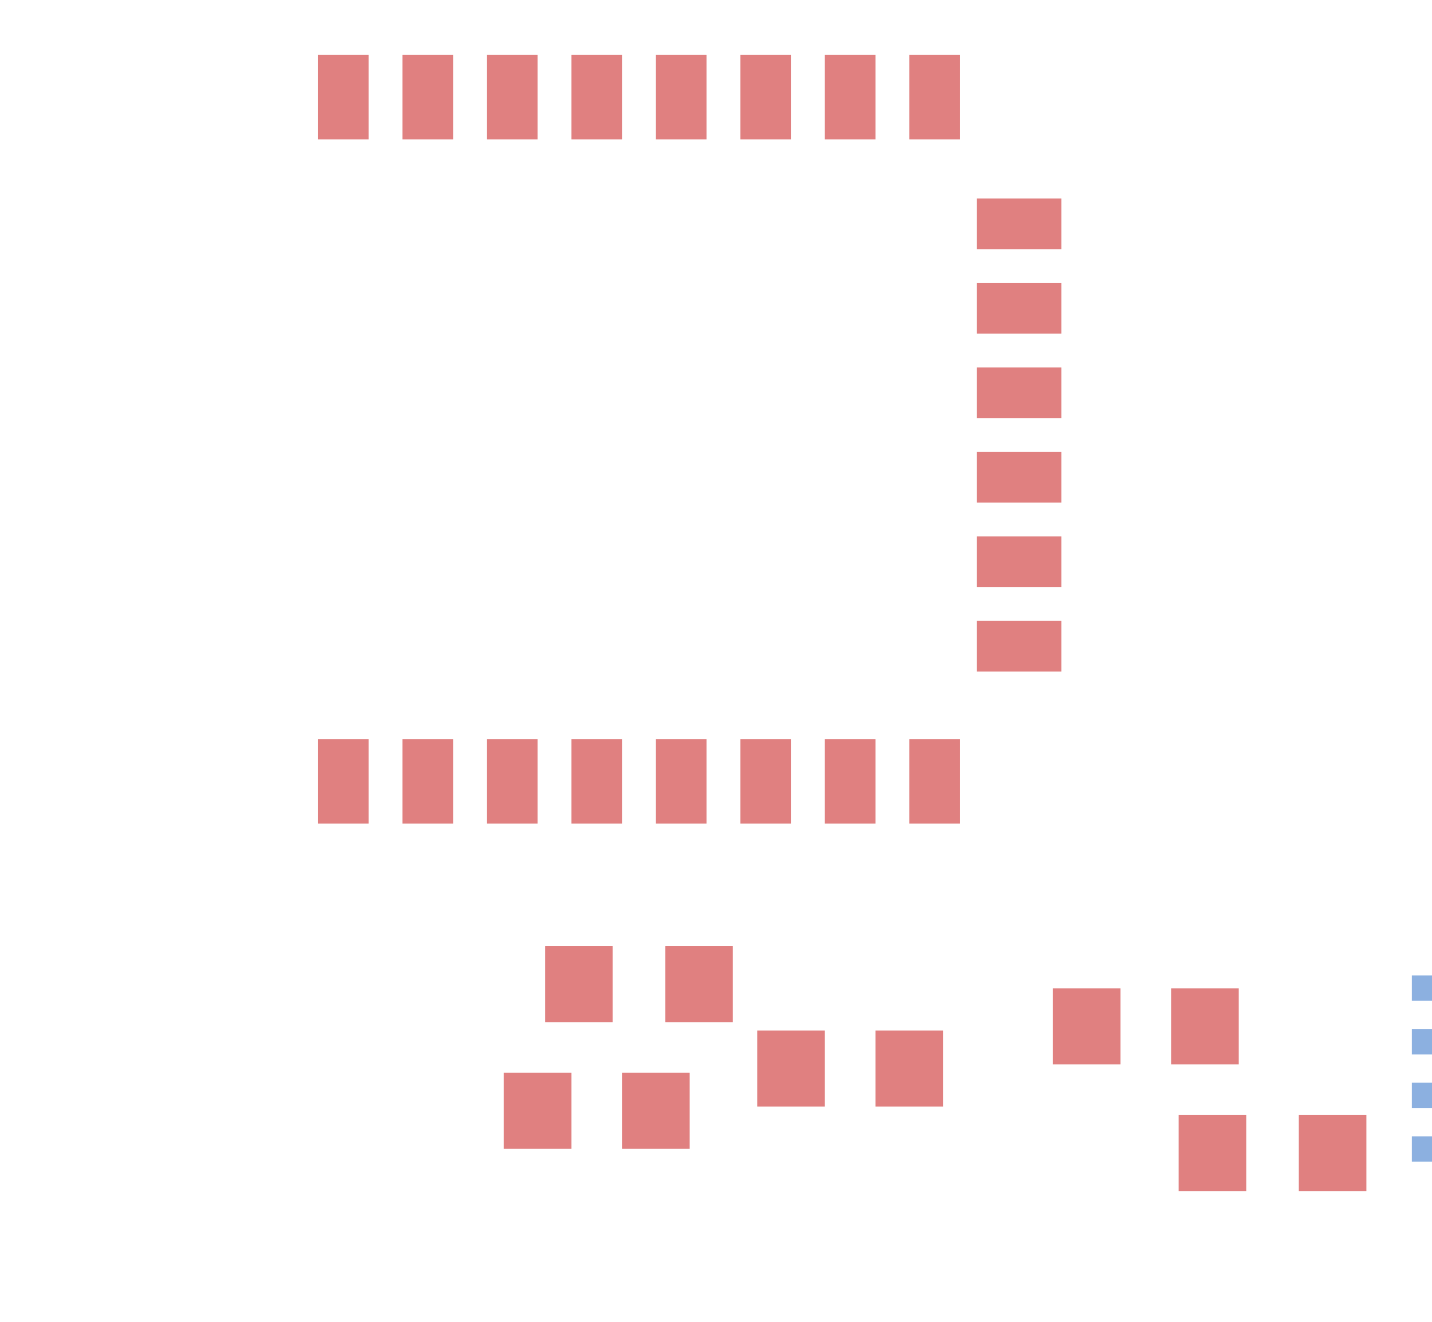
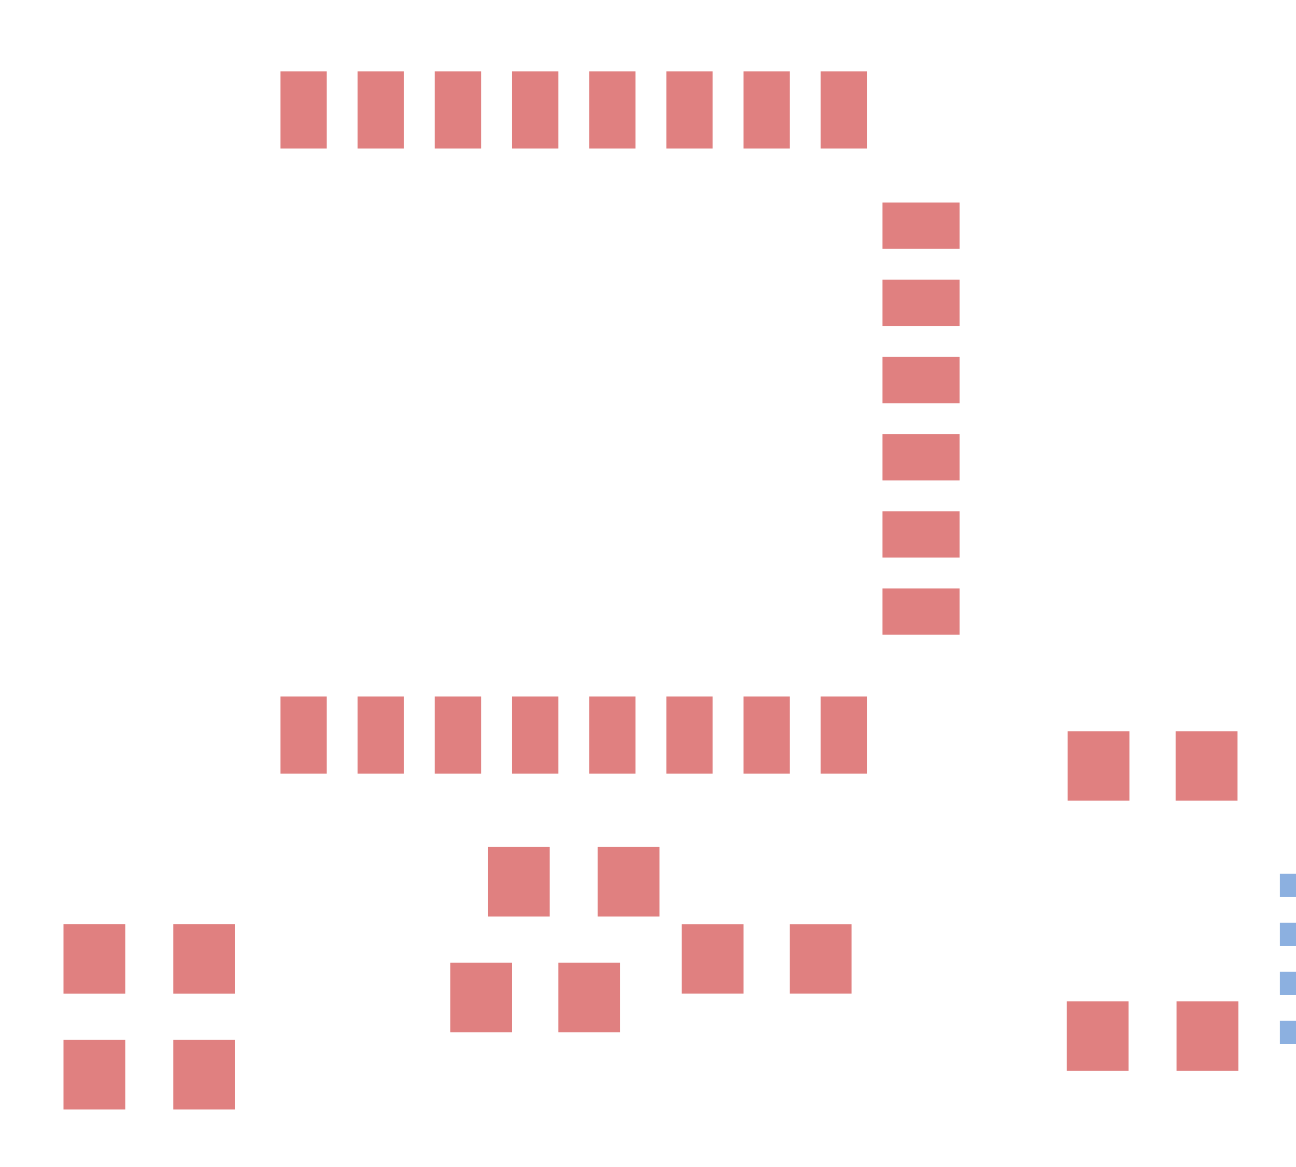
part position: (689, 439) -> (620, 422)
part position: (1145, 1026) -> (1152, 765)
part: none -> (149, 958)
part: none -> (149, 1074)

